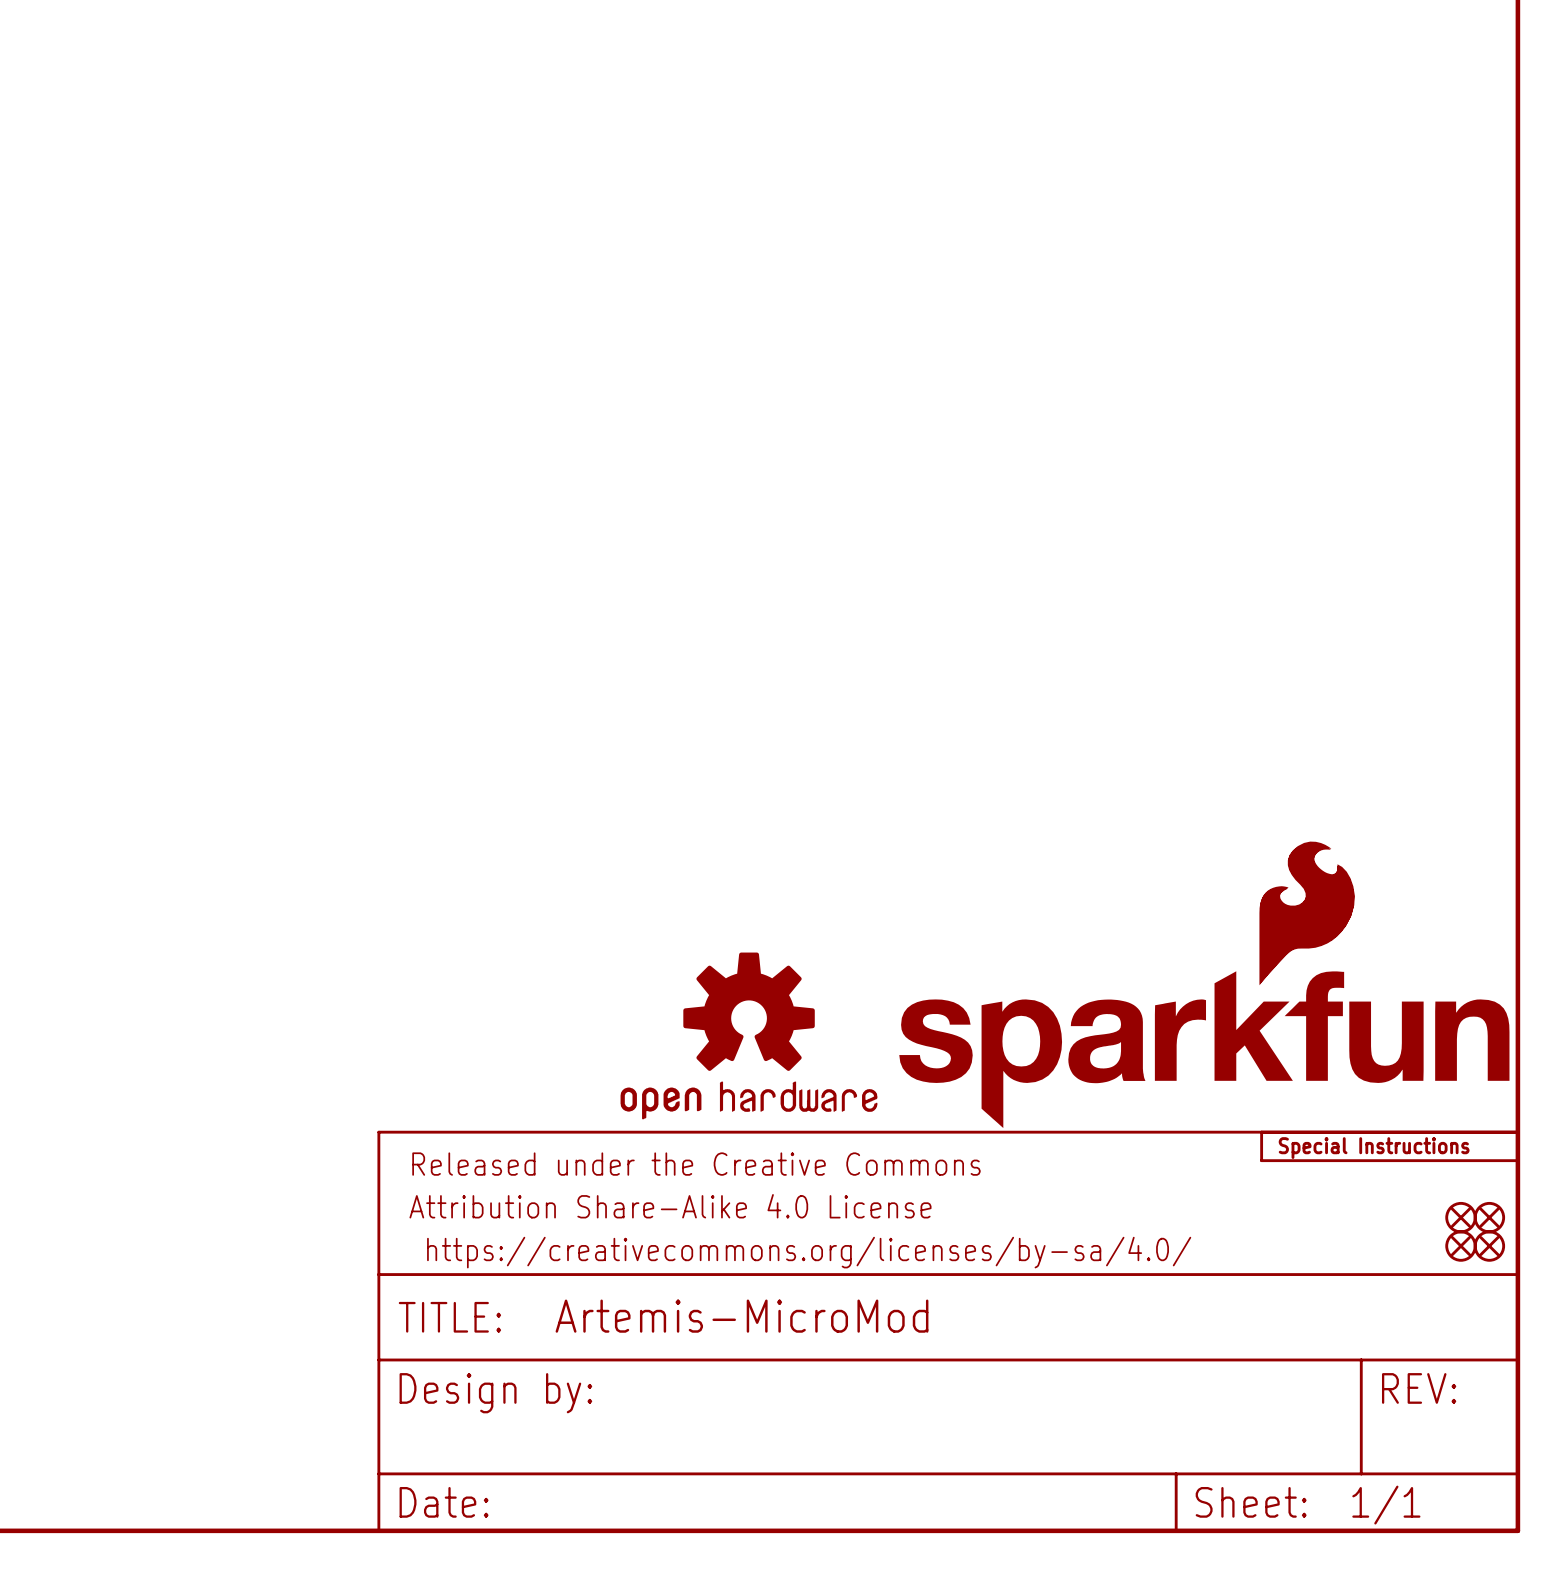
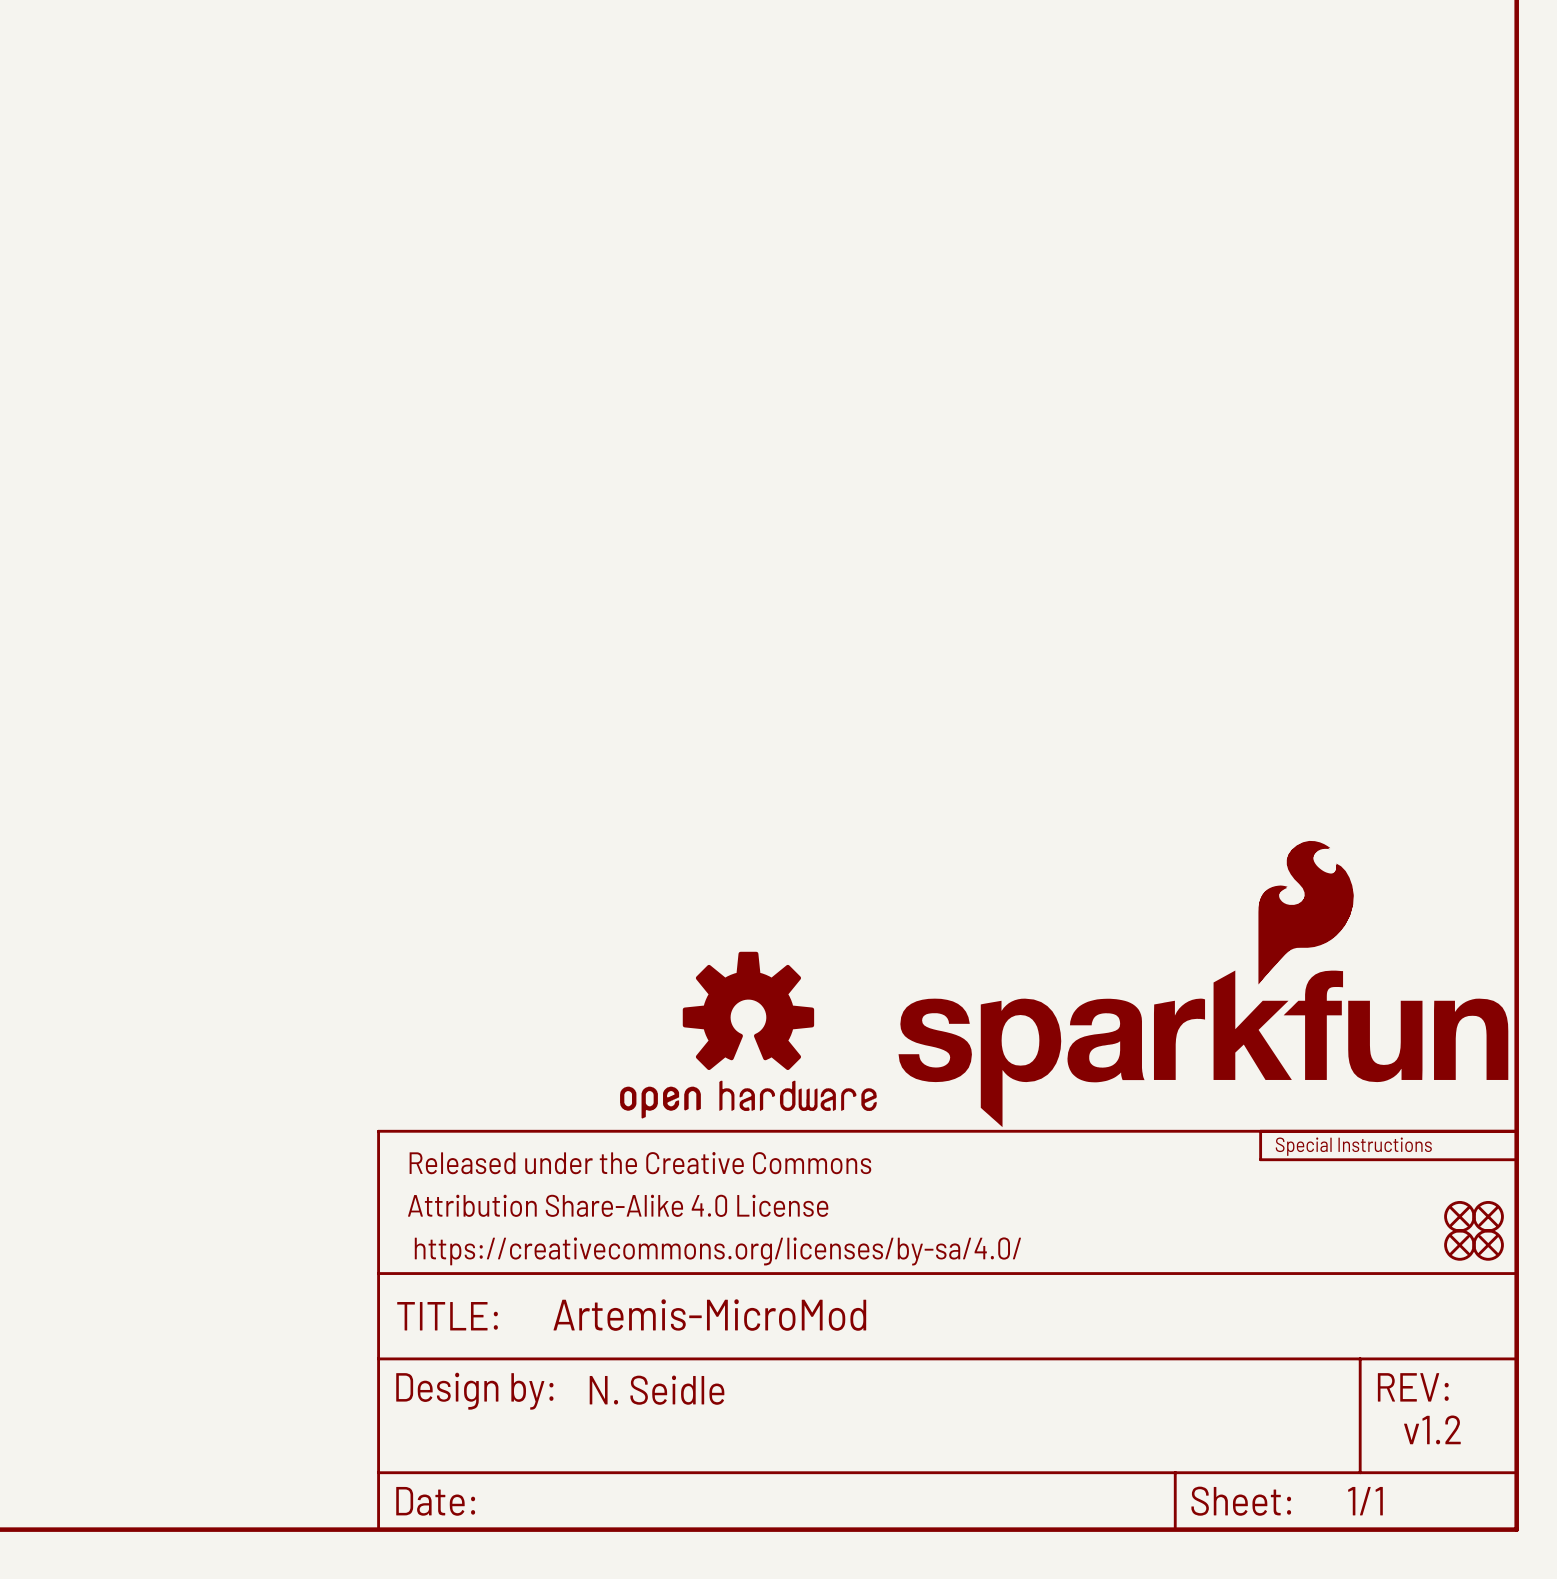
text: none -> N. Seidle (657, 1390)
text: none -> v1.2 (1432, 1429)

